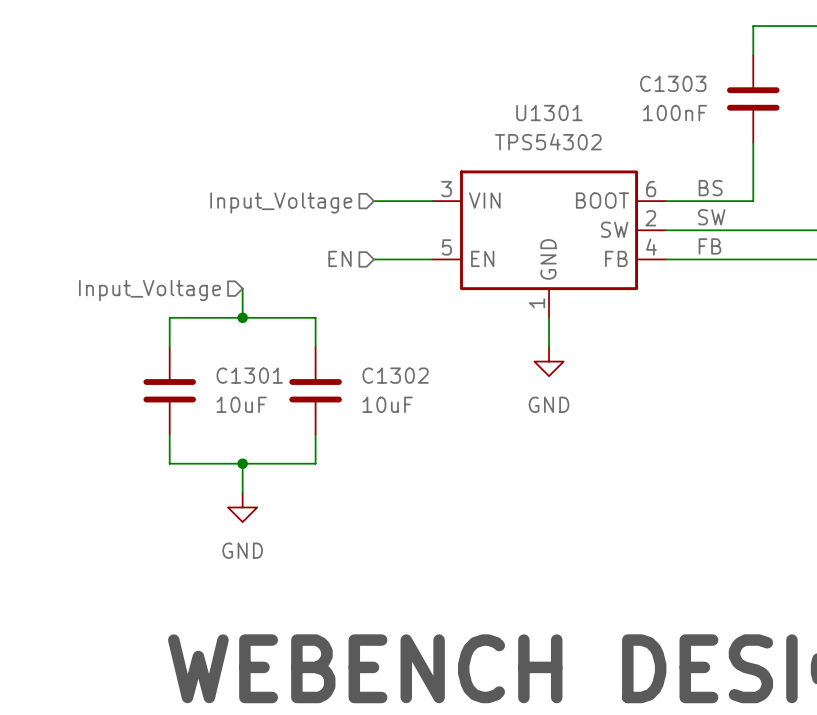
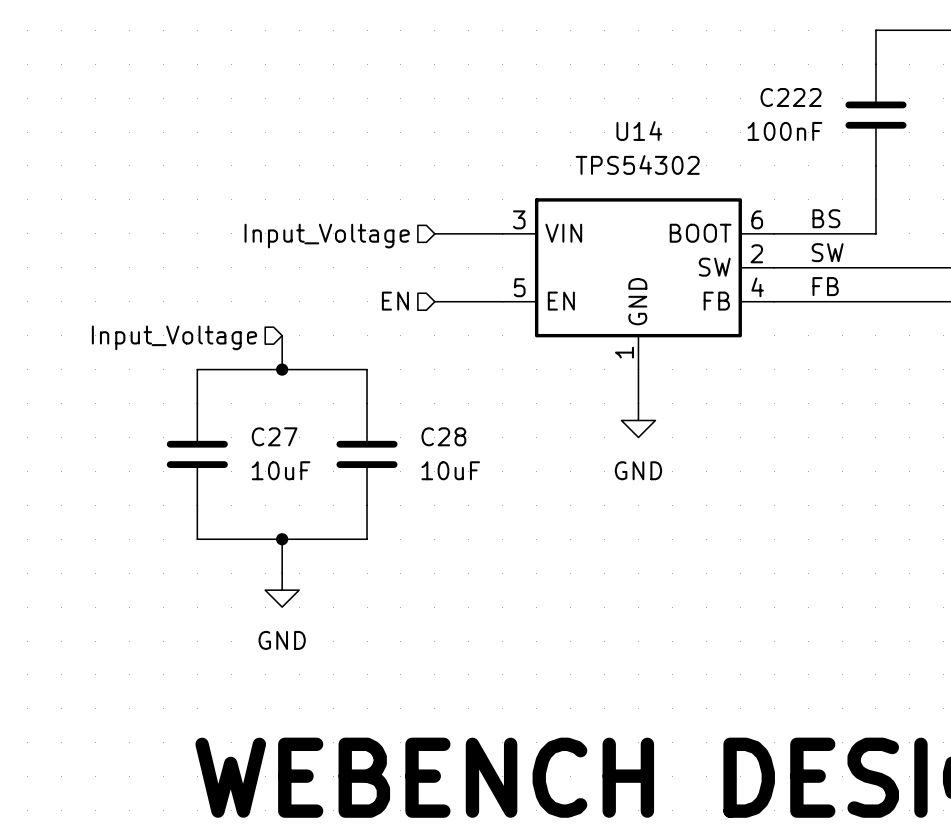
C1303 name: C1303 (673, 83) -> C222 (791, 97)
U1301 name: U1301 (549, 113) -> U14 (639, 131)
C1301 name: C1301 (249, 375) -> C27 (274, 436)
C1302 name: C1302 (395, 375) -> C28 (443, 436)

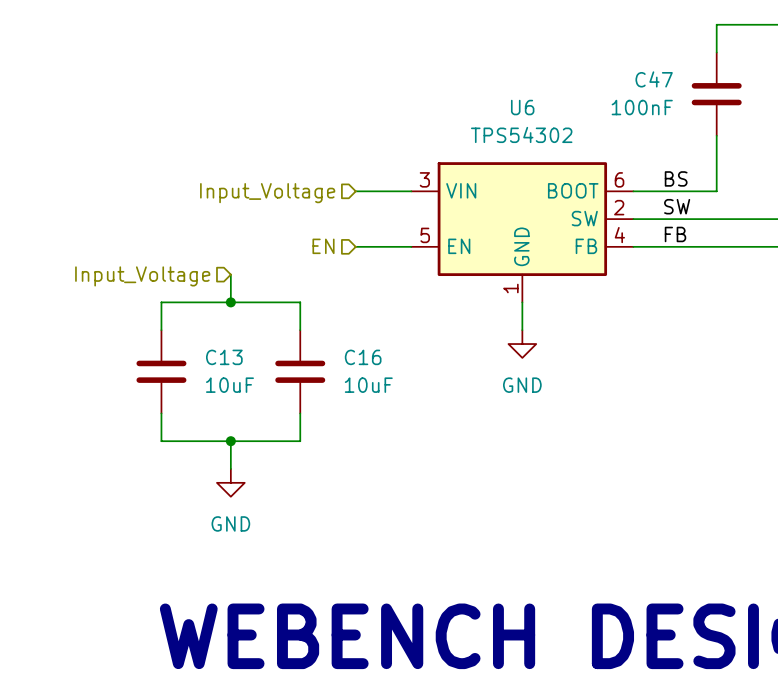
C222 name: C222 (791, 97) -> C47 (654, 79)
U14 name: U14 (639, 131) -> U6 (522, 107)
C27 name: C27 (274, 436) -> C13 (224, 357)
C28 name: C28 (443, 436) -> C16 (363, 357)

